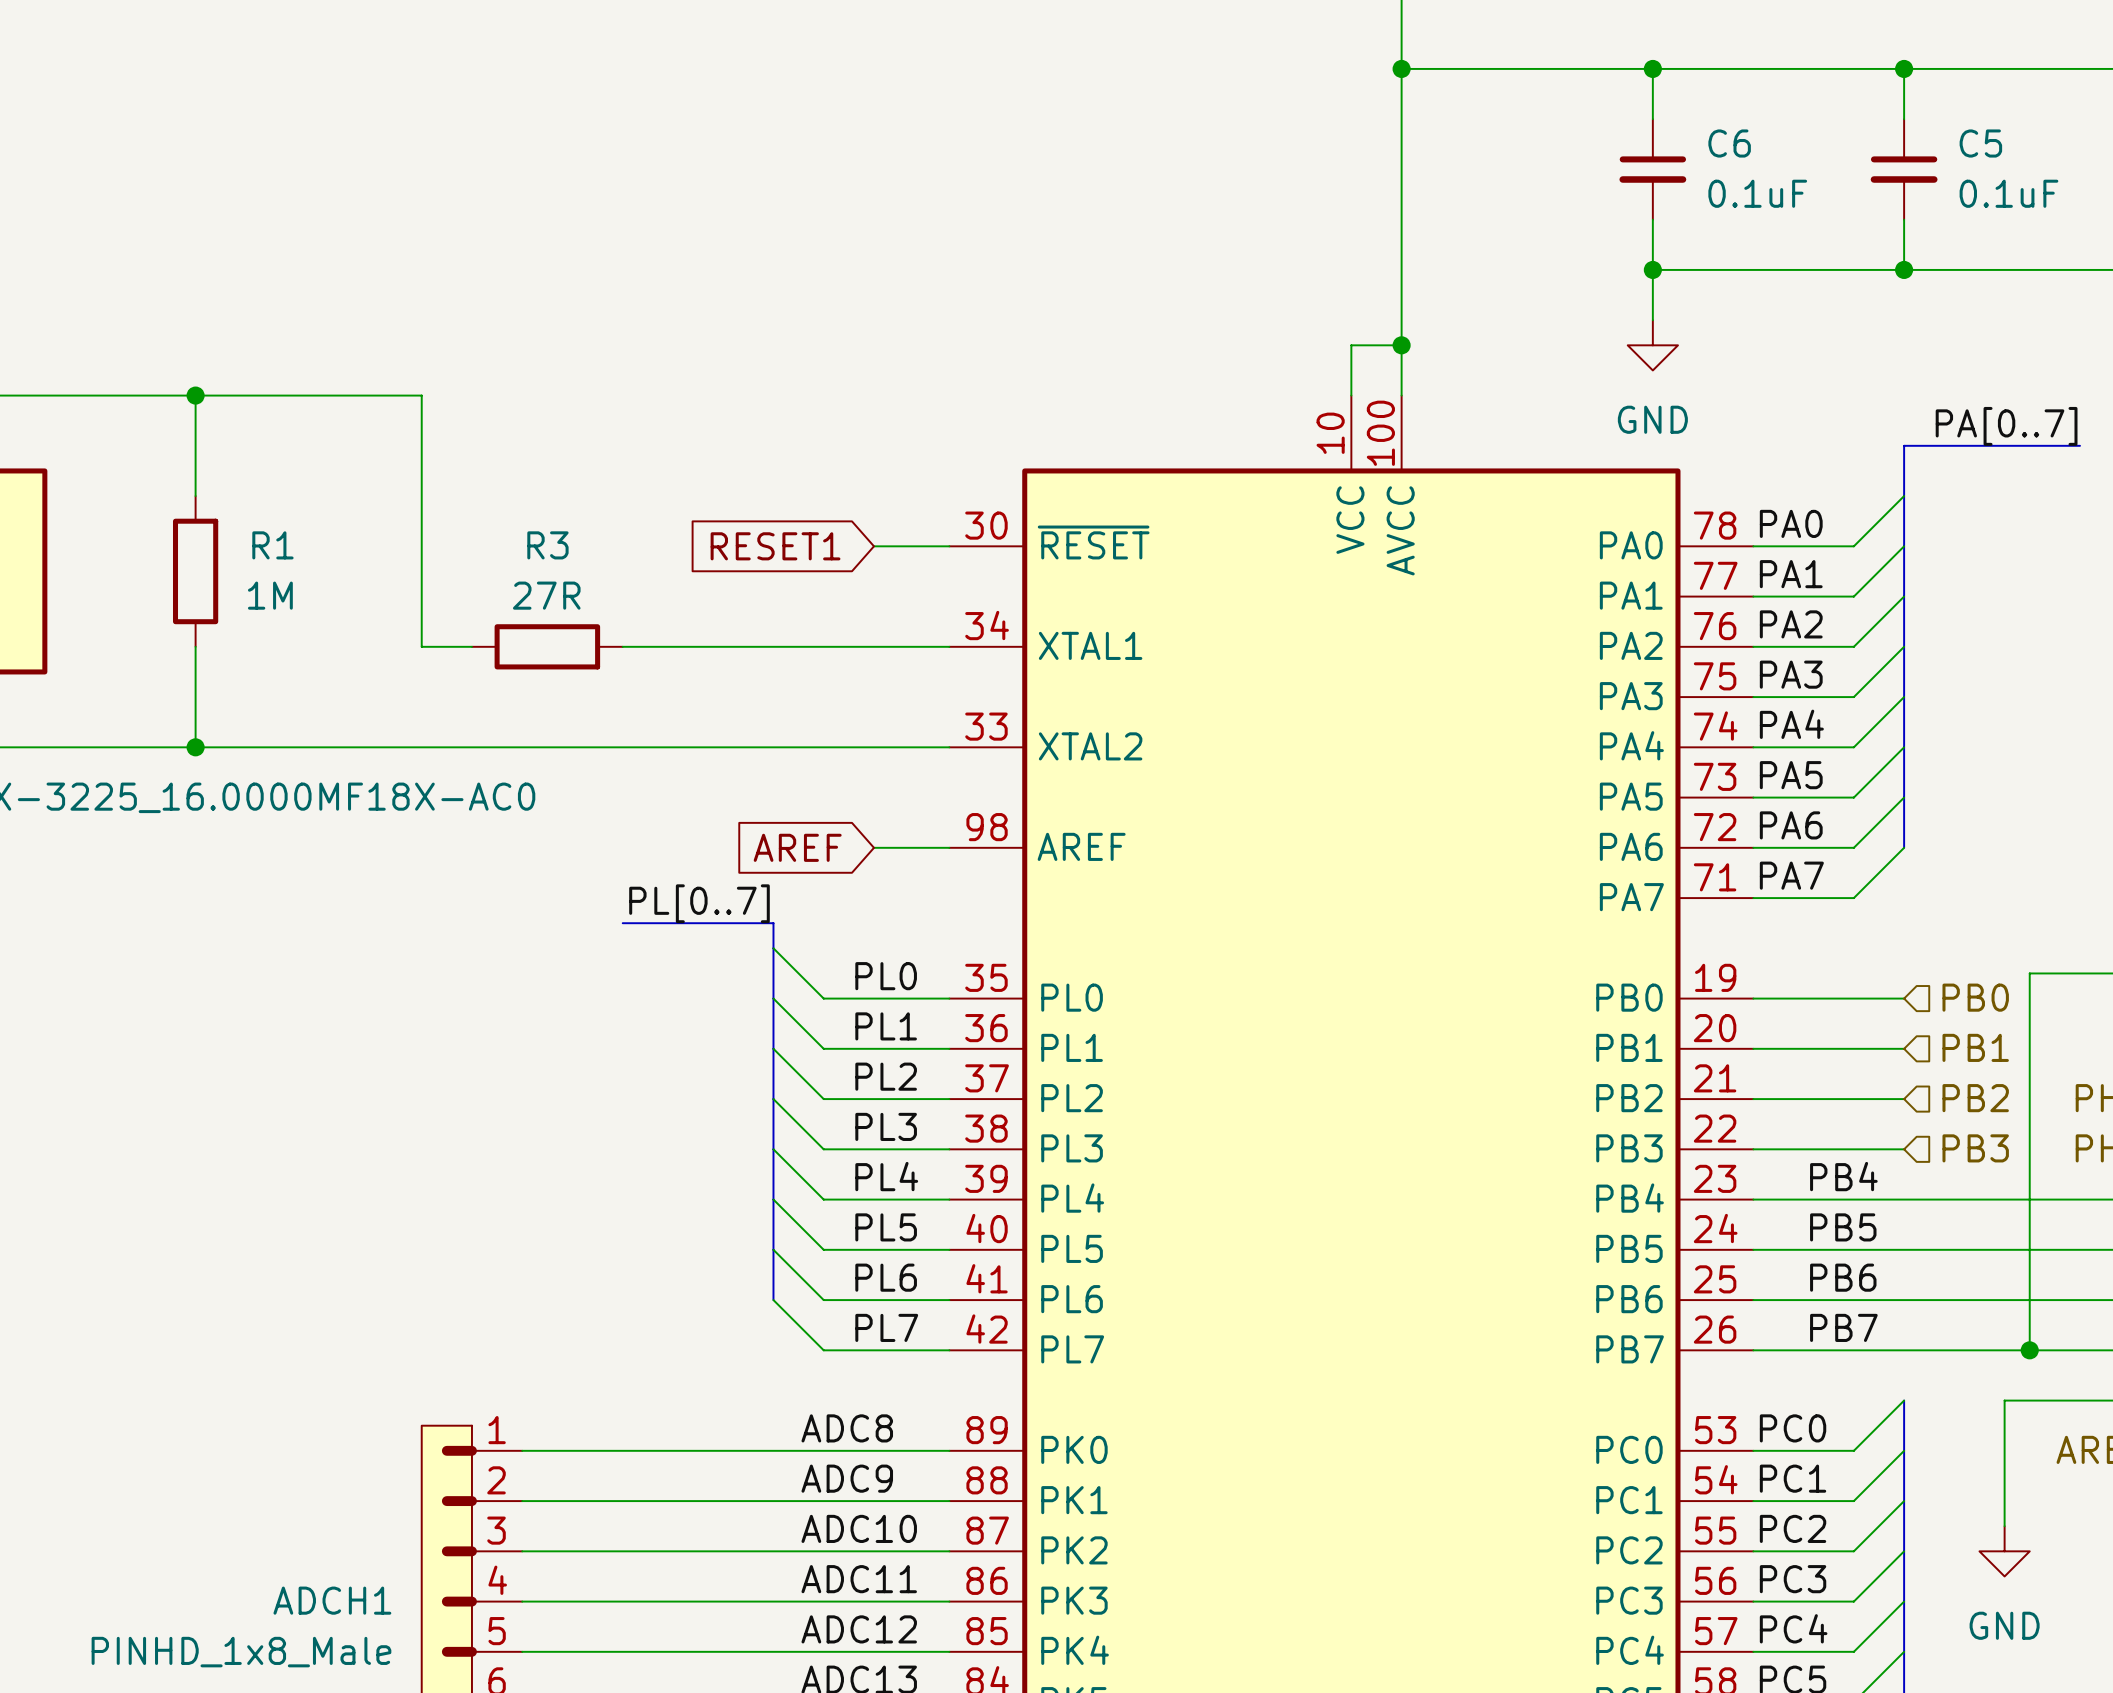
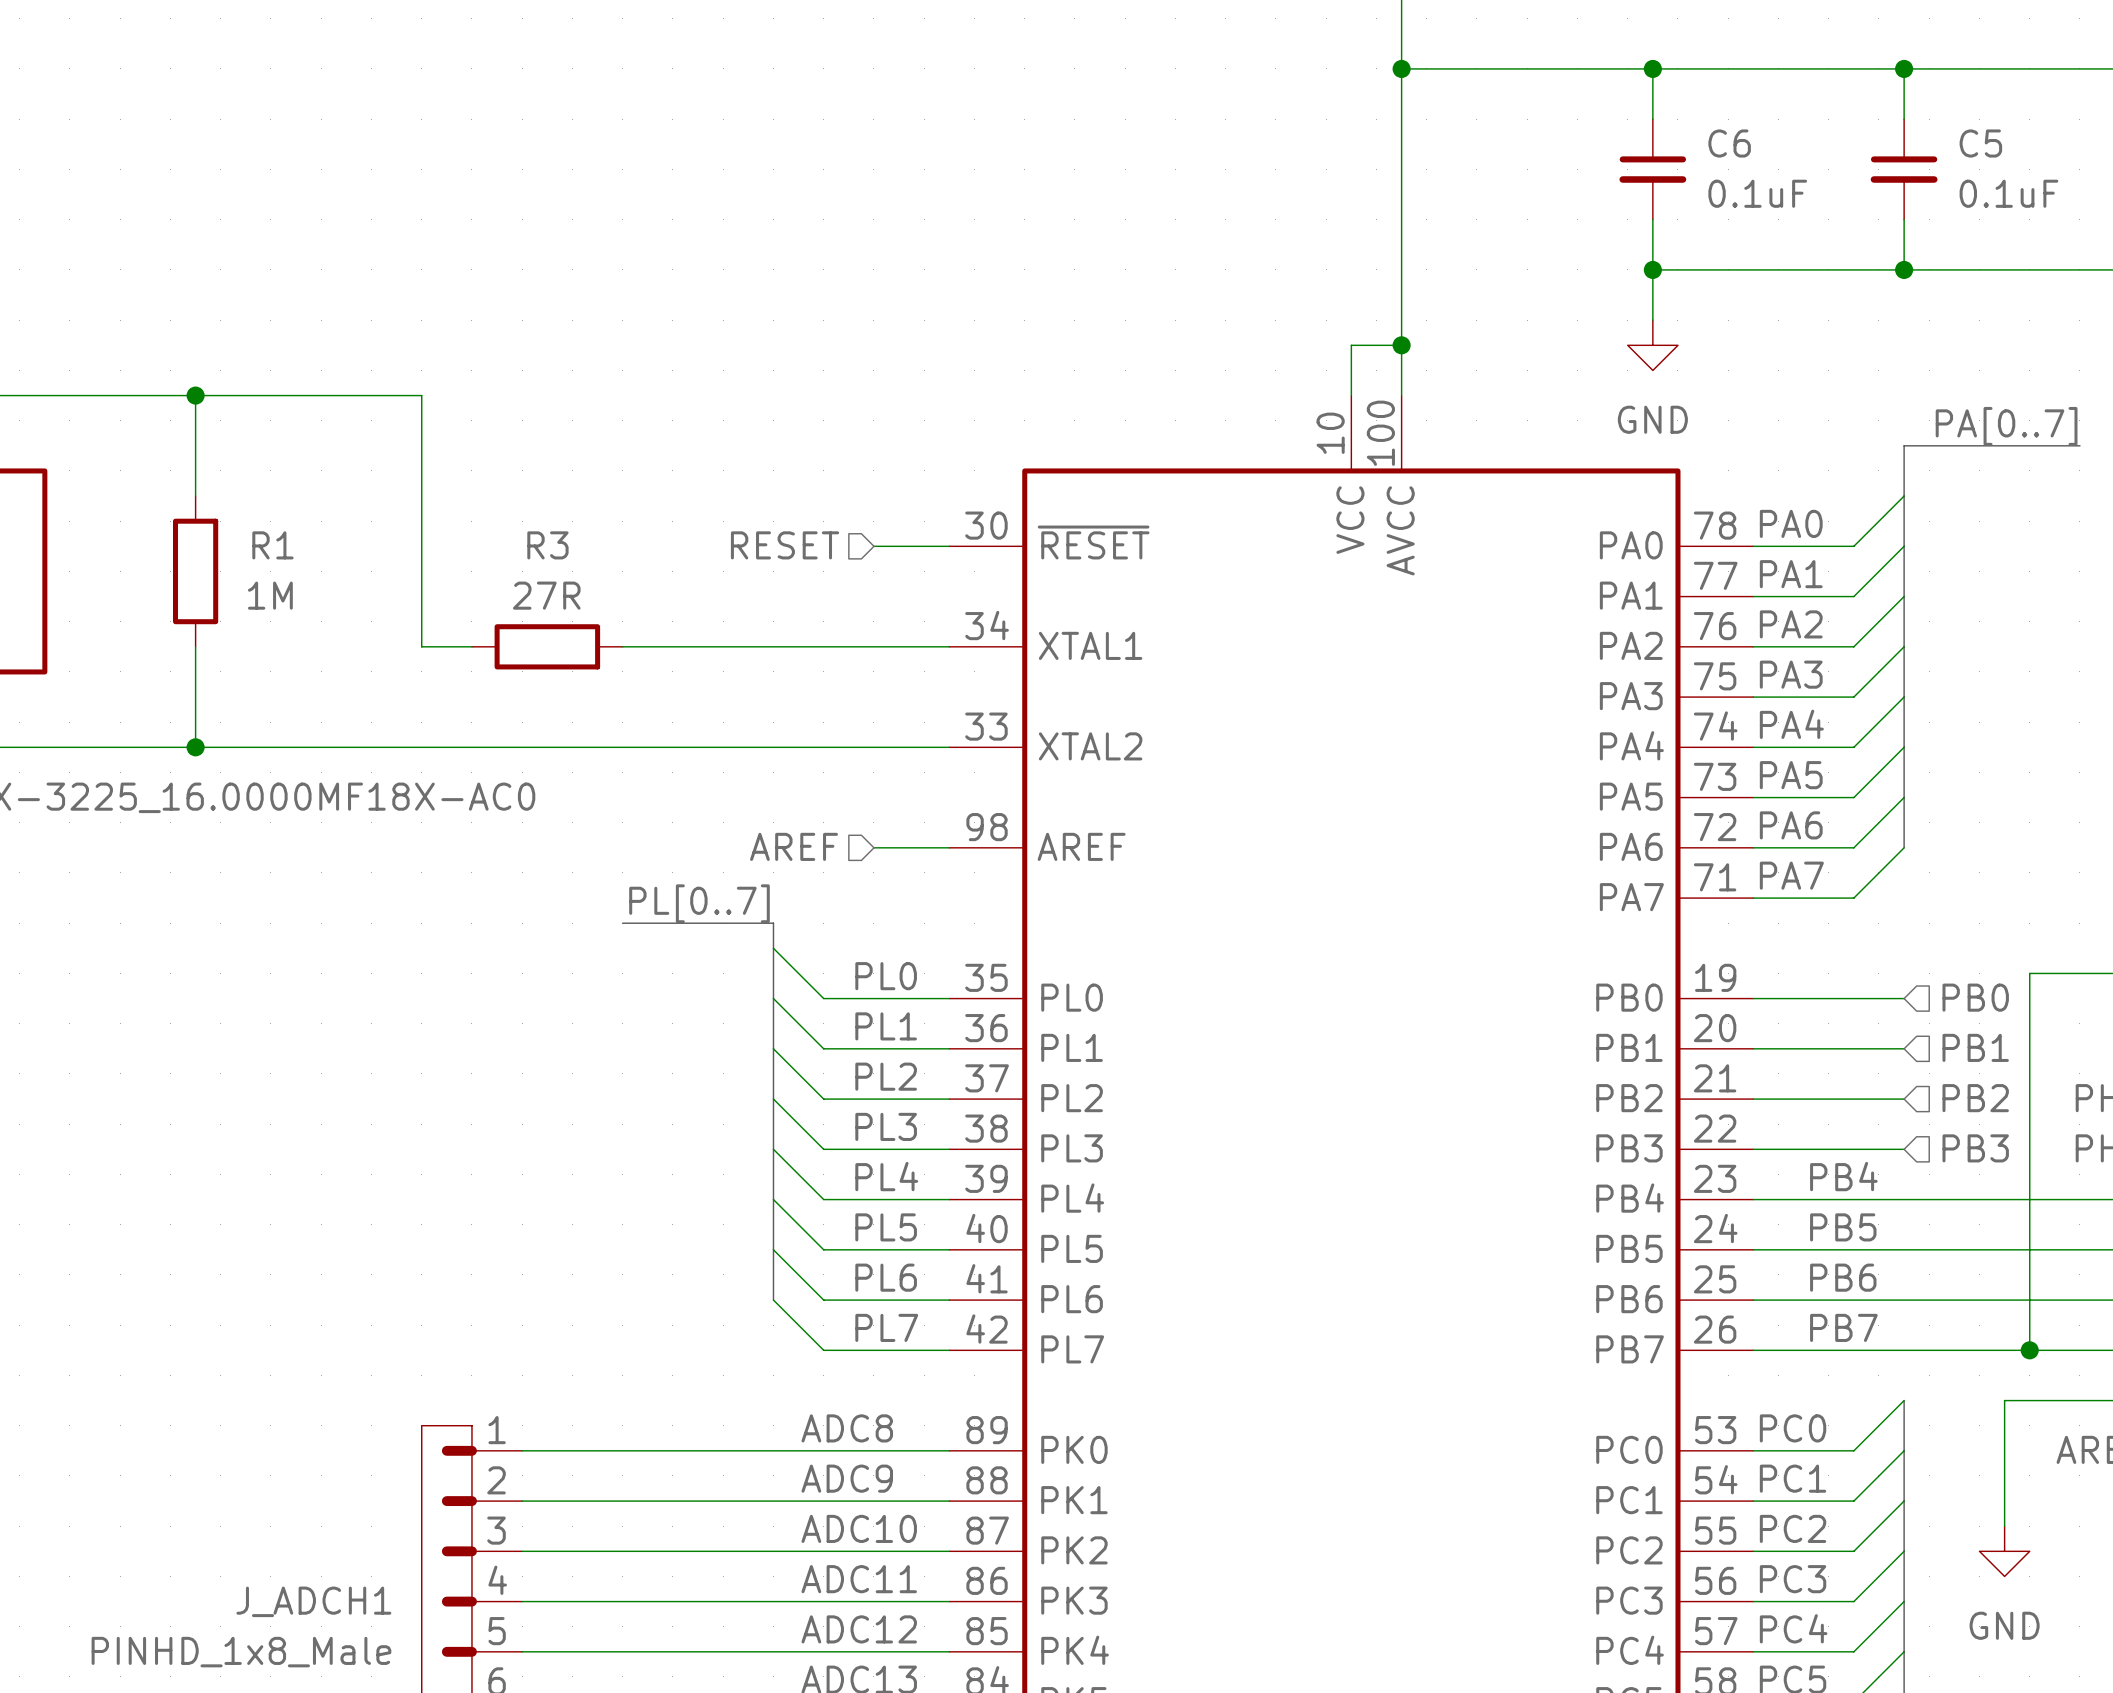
hierarchical label: none -> RESET (785, 545)
global label: RESET1 (775, 546) -> none
hierarchical label: none -> AREF (794, 846)
global label: AREF (797, 847) -> none
ADCH1 name: ADCH1 (332, 1600) -> J_ADCH1 (313, 1601)

